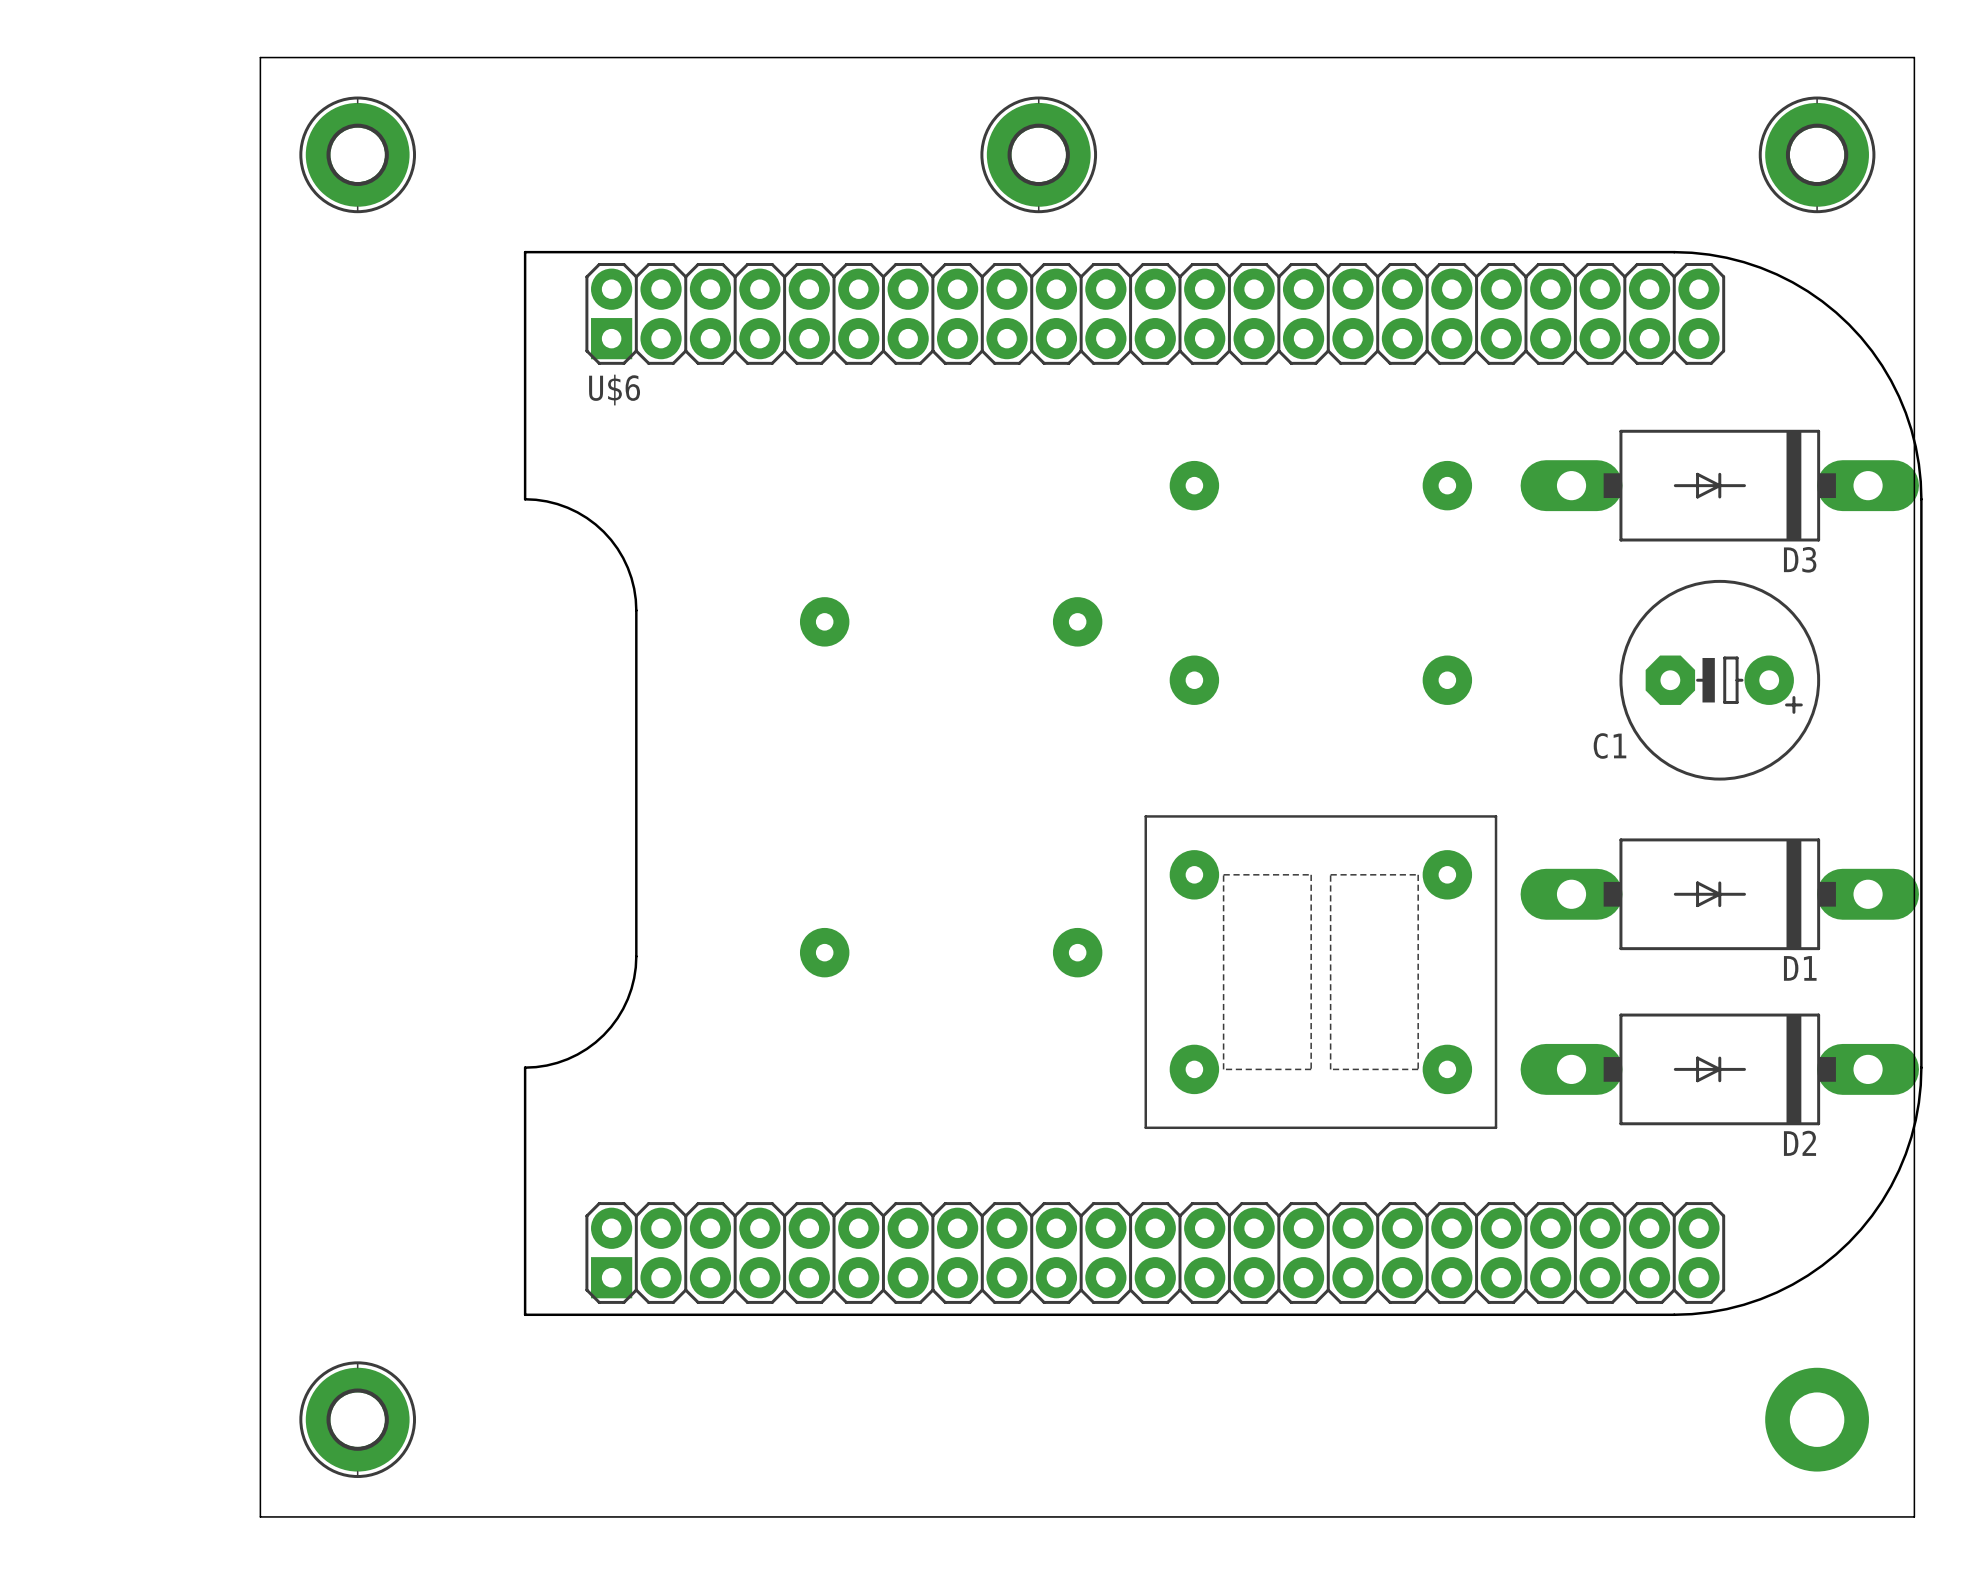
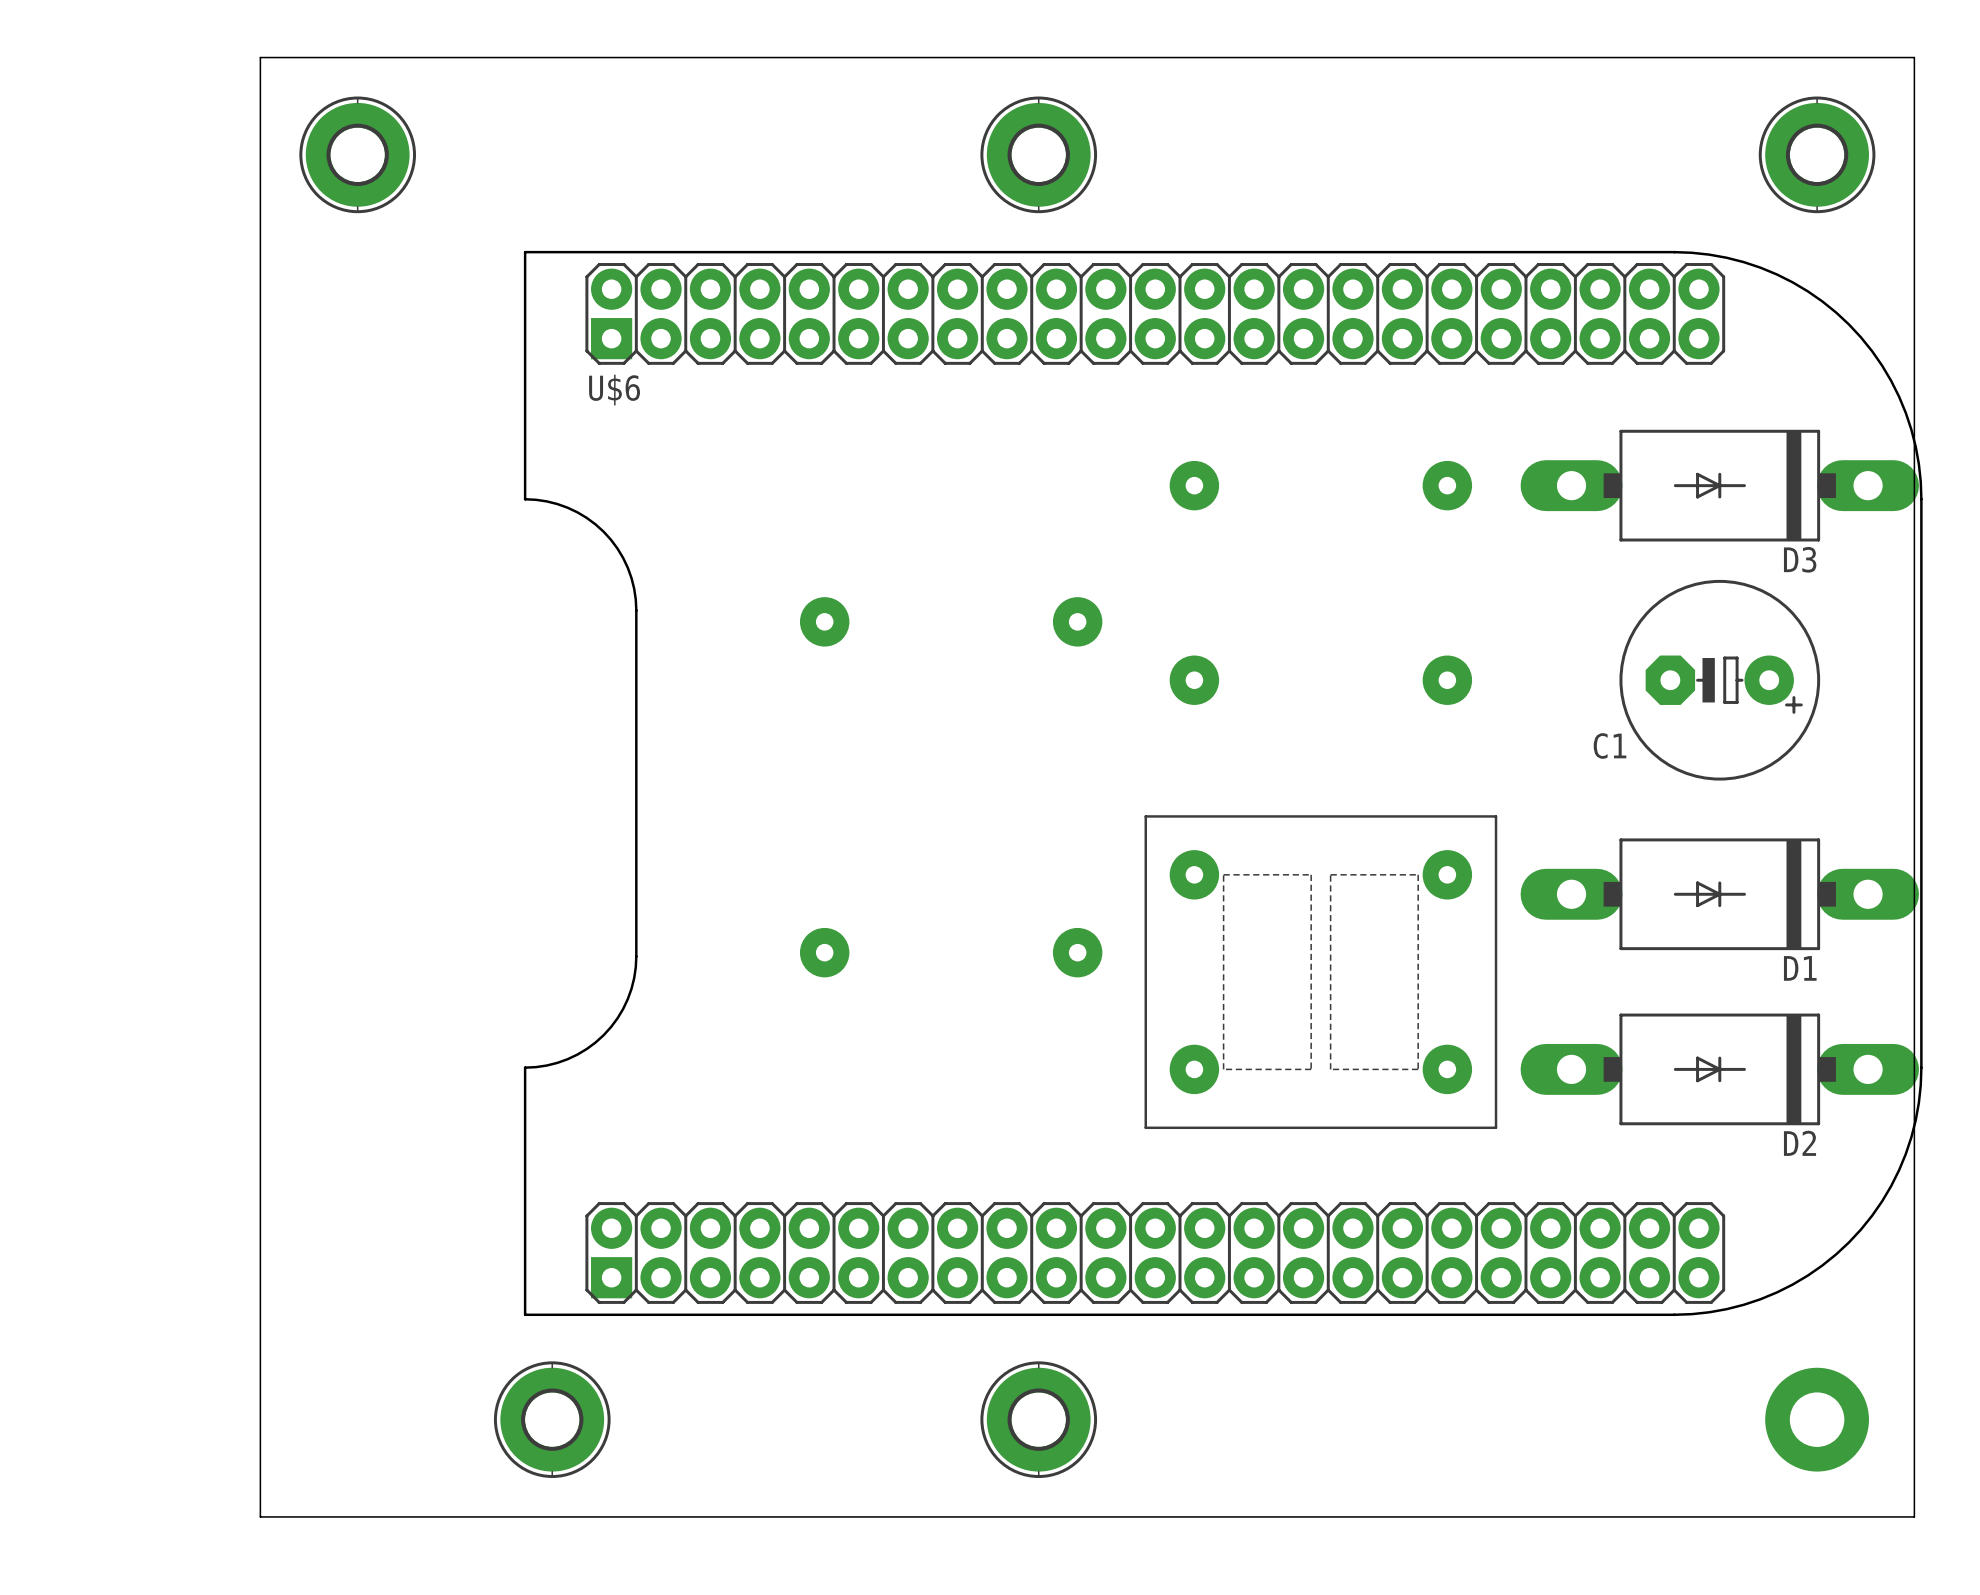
part position: (357, 1419) -> (552, 1419)
part: none -> (1038, 1419)

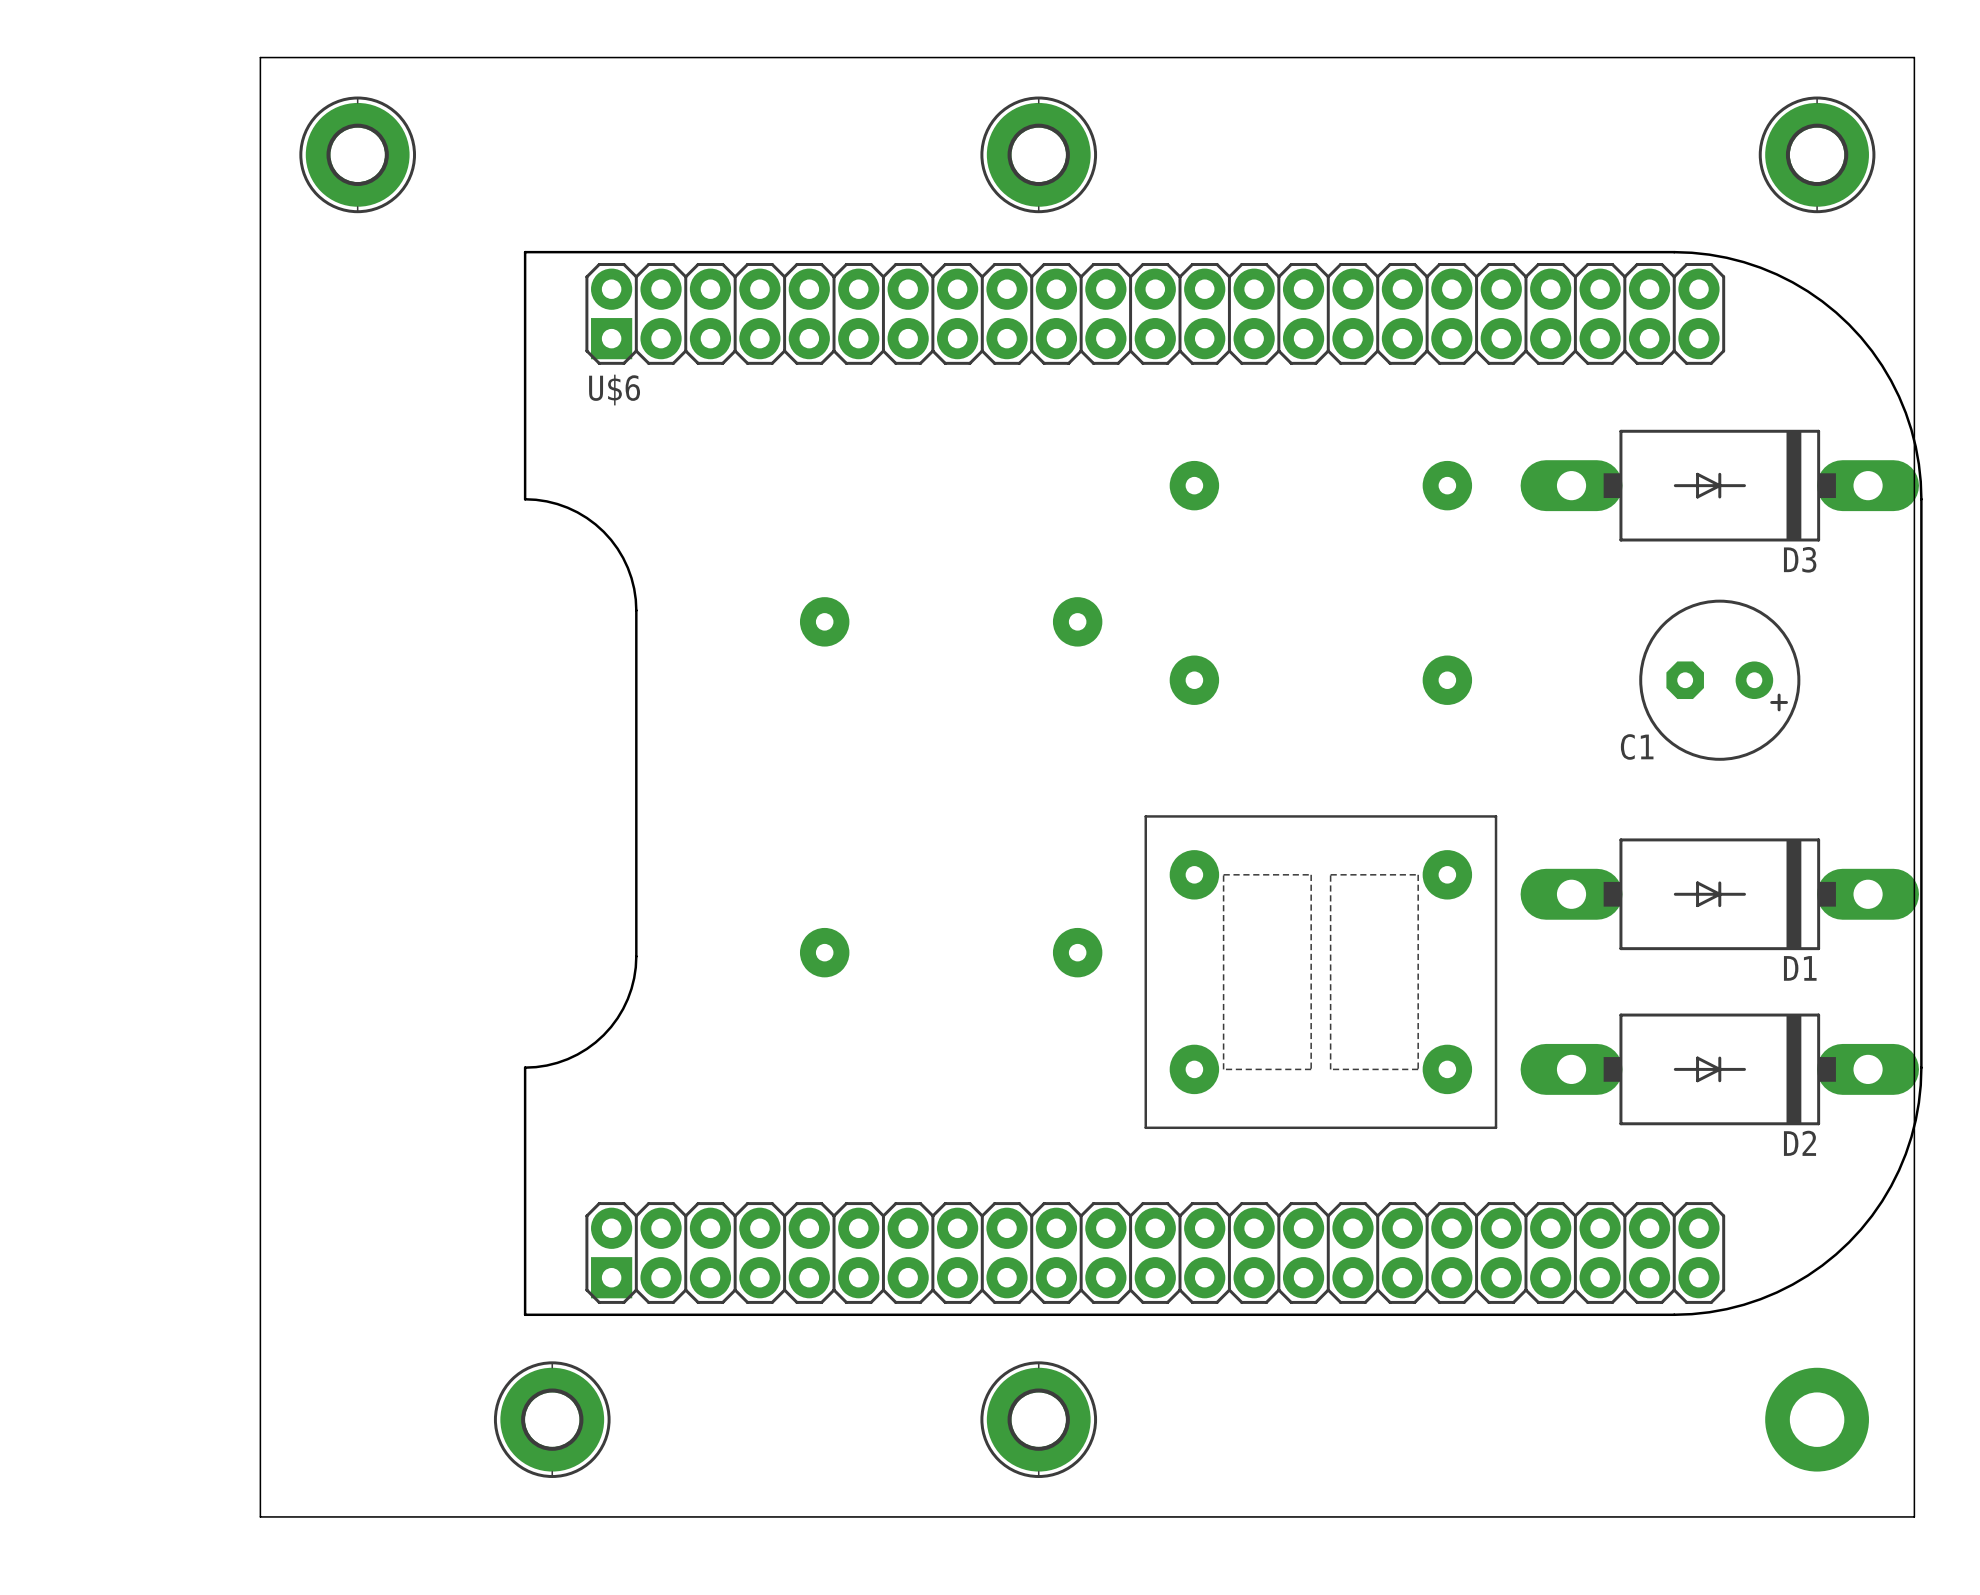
C1 footprint: [1619, 579, 1821, 781] -> [1639, 599, 1801, 761]

